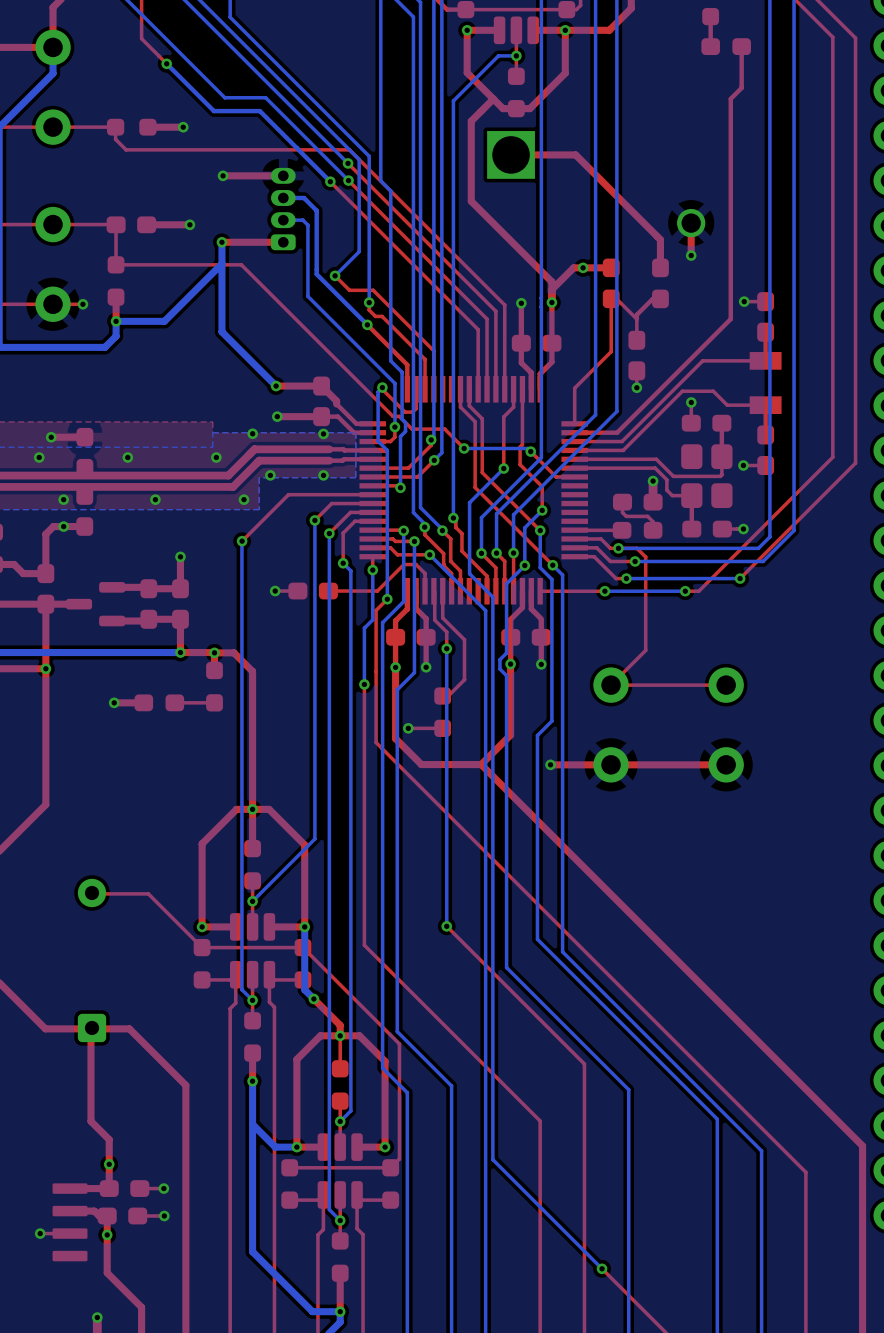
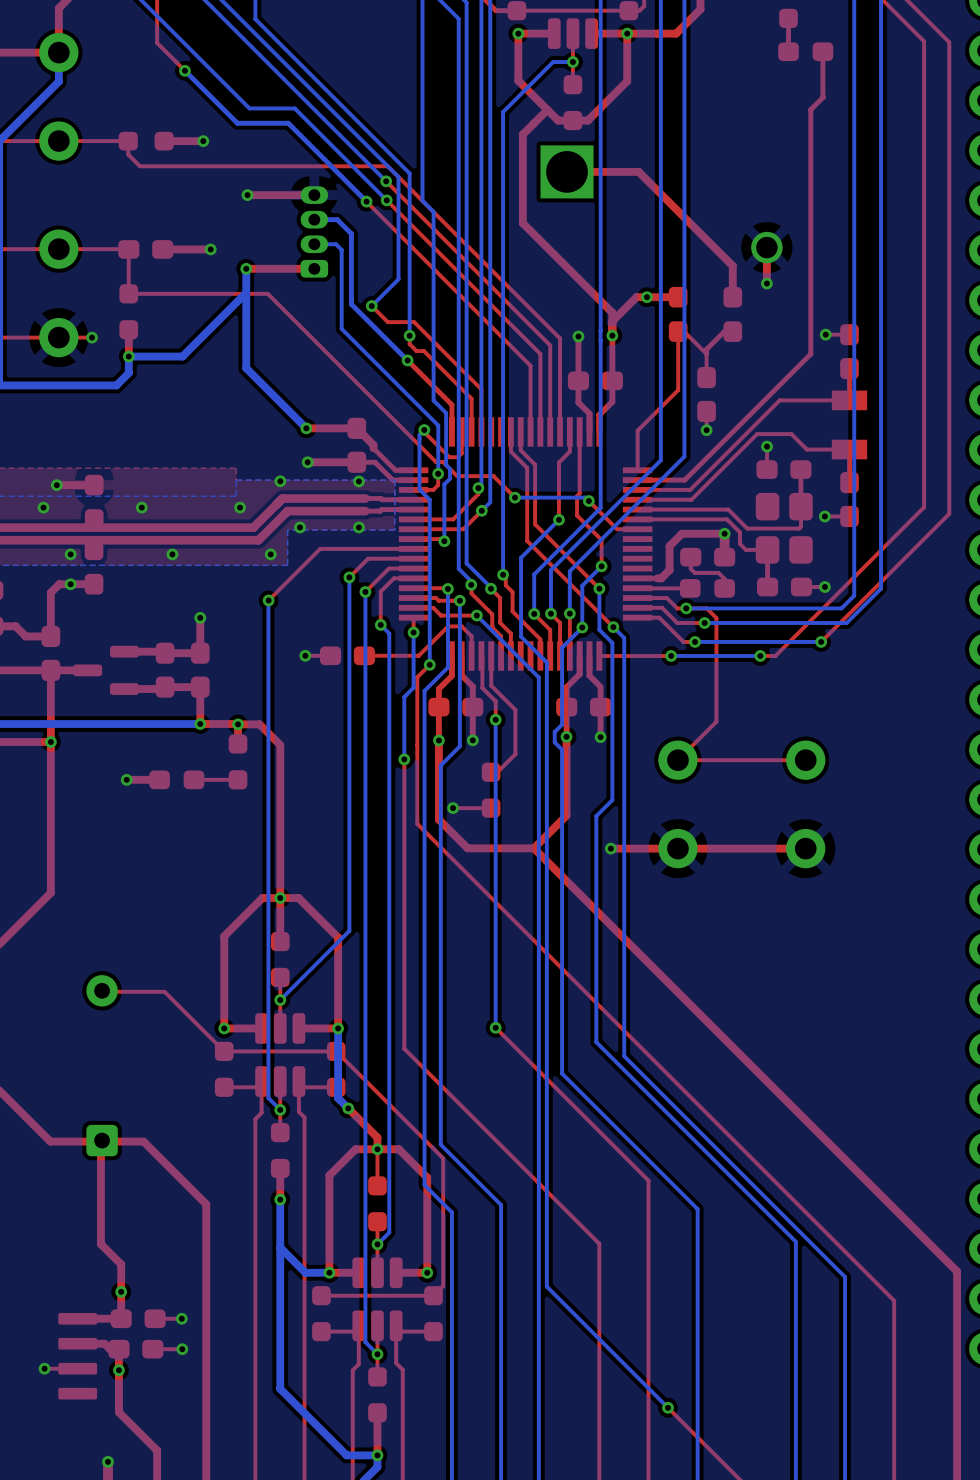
top track: none -> (724, 533) (681, 533) (669, 546) (669, 570) (661, 578) (637, 578)

